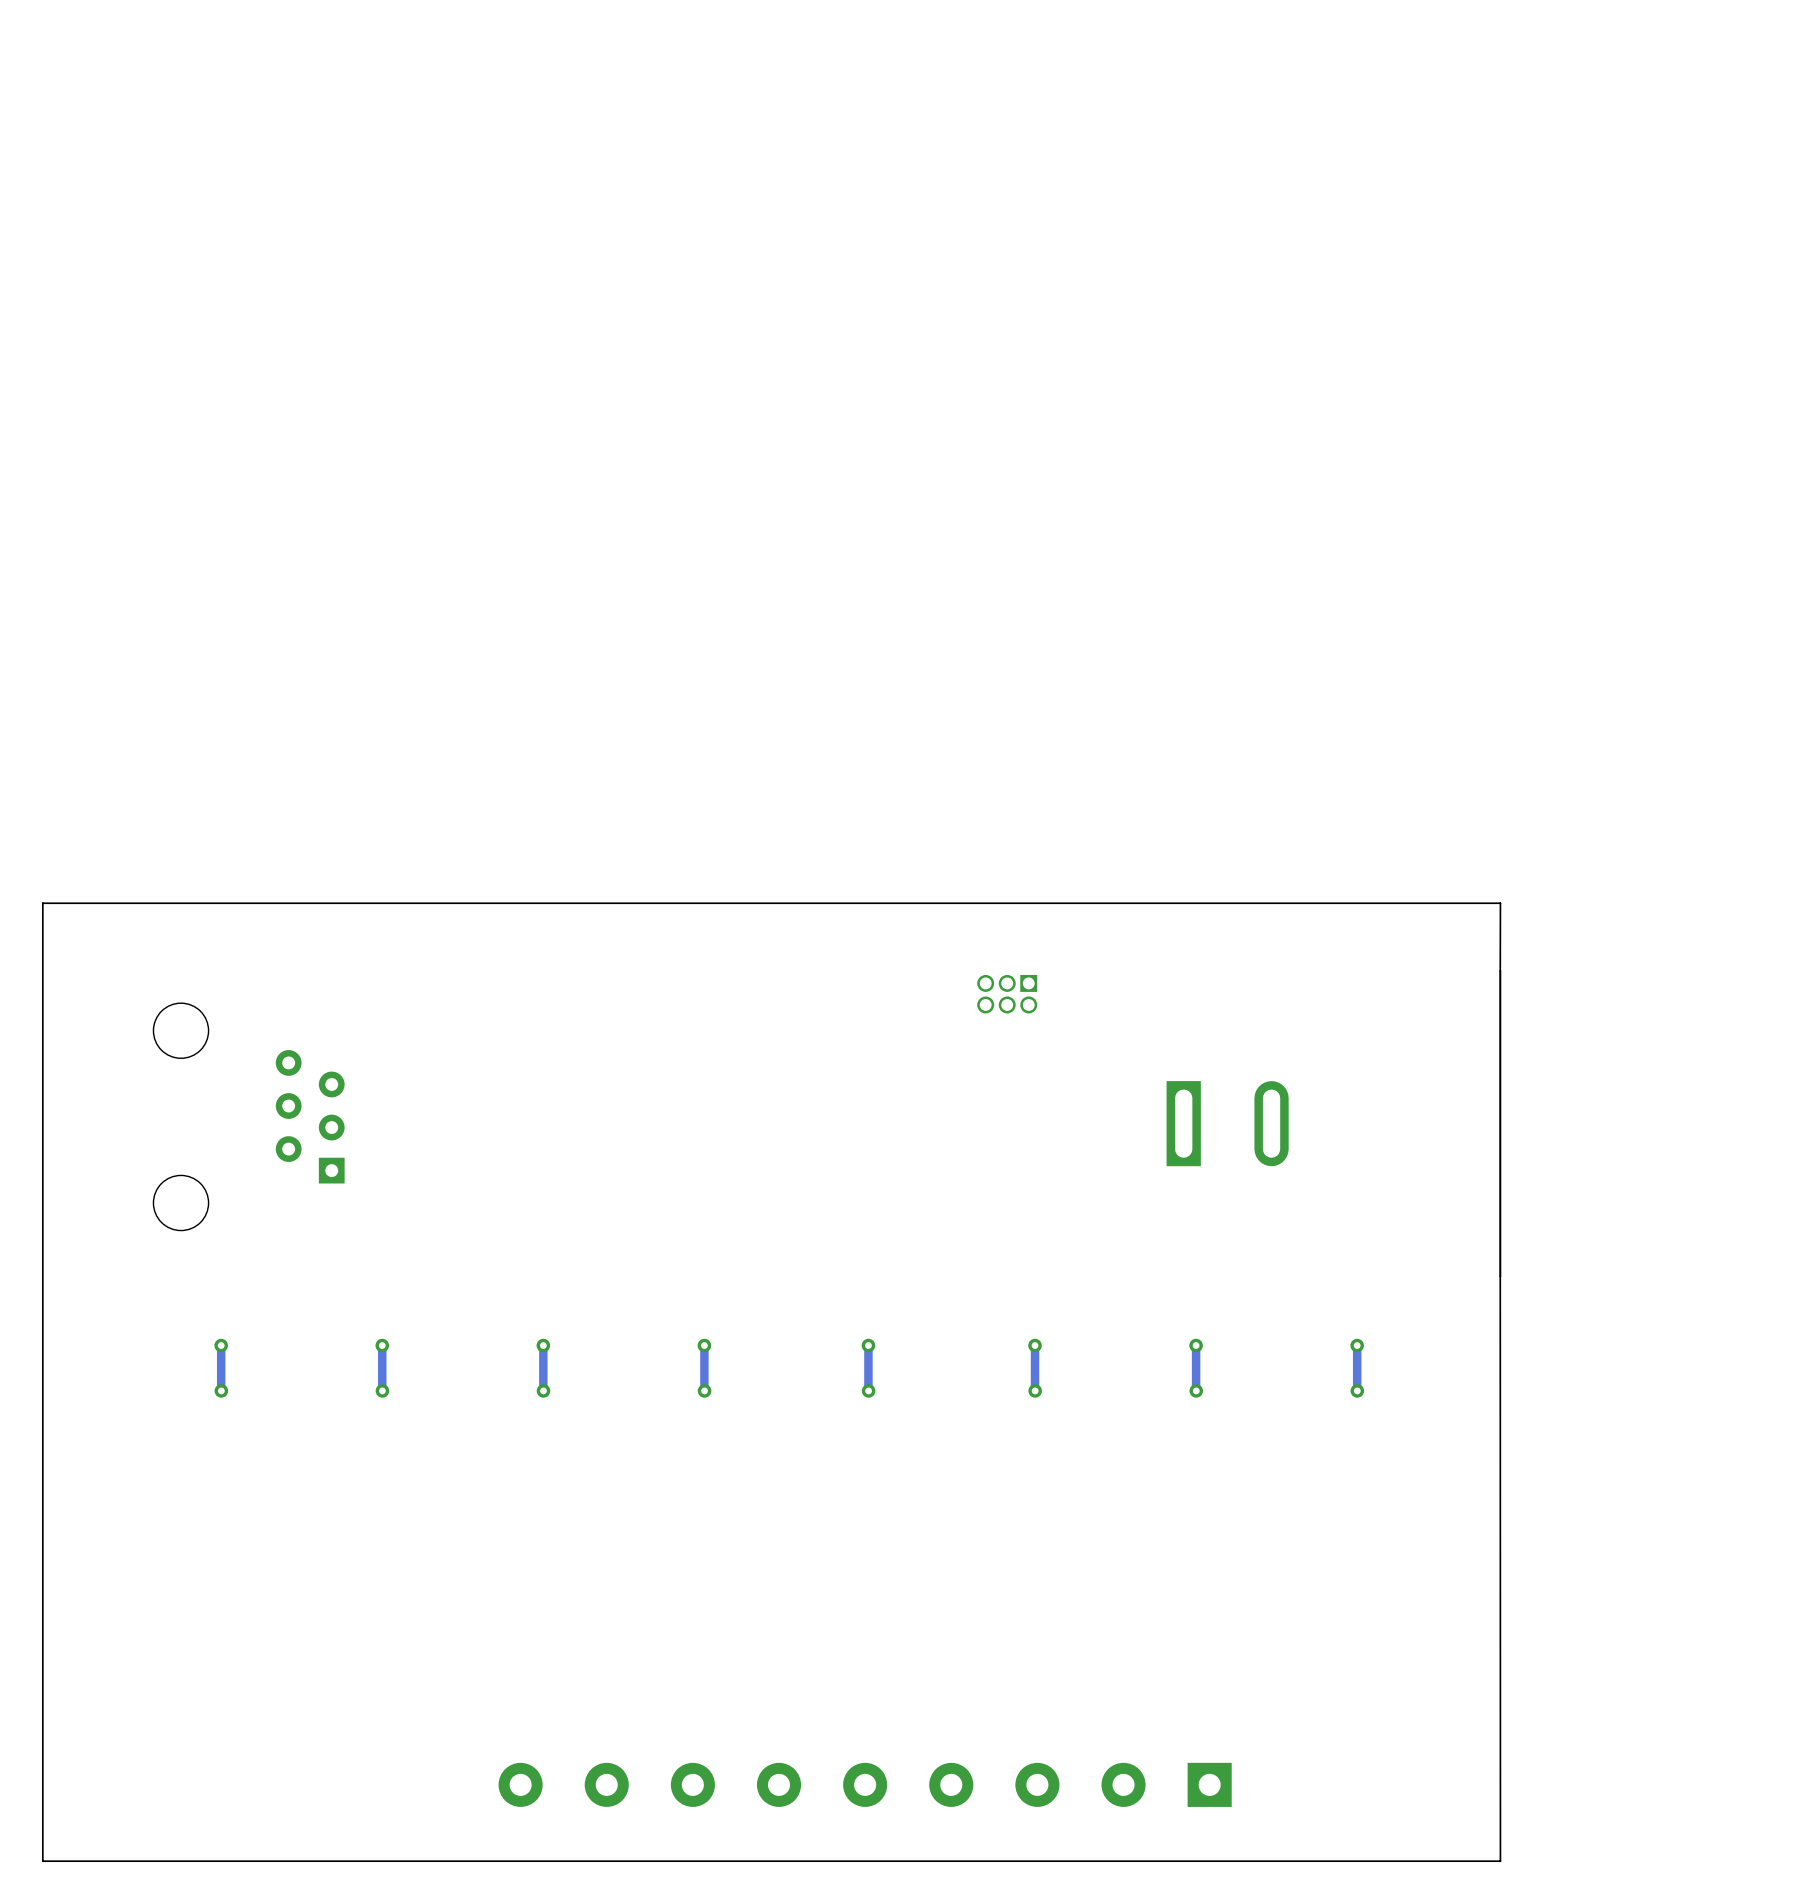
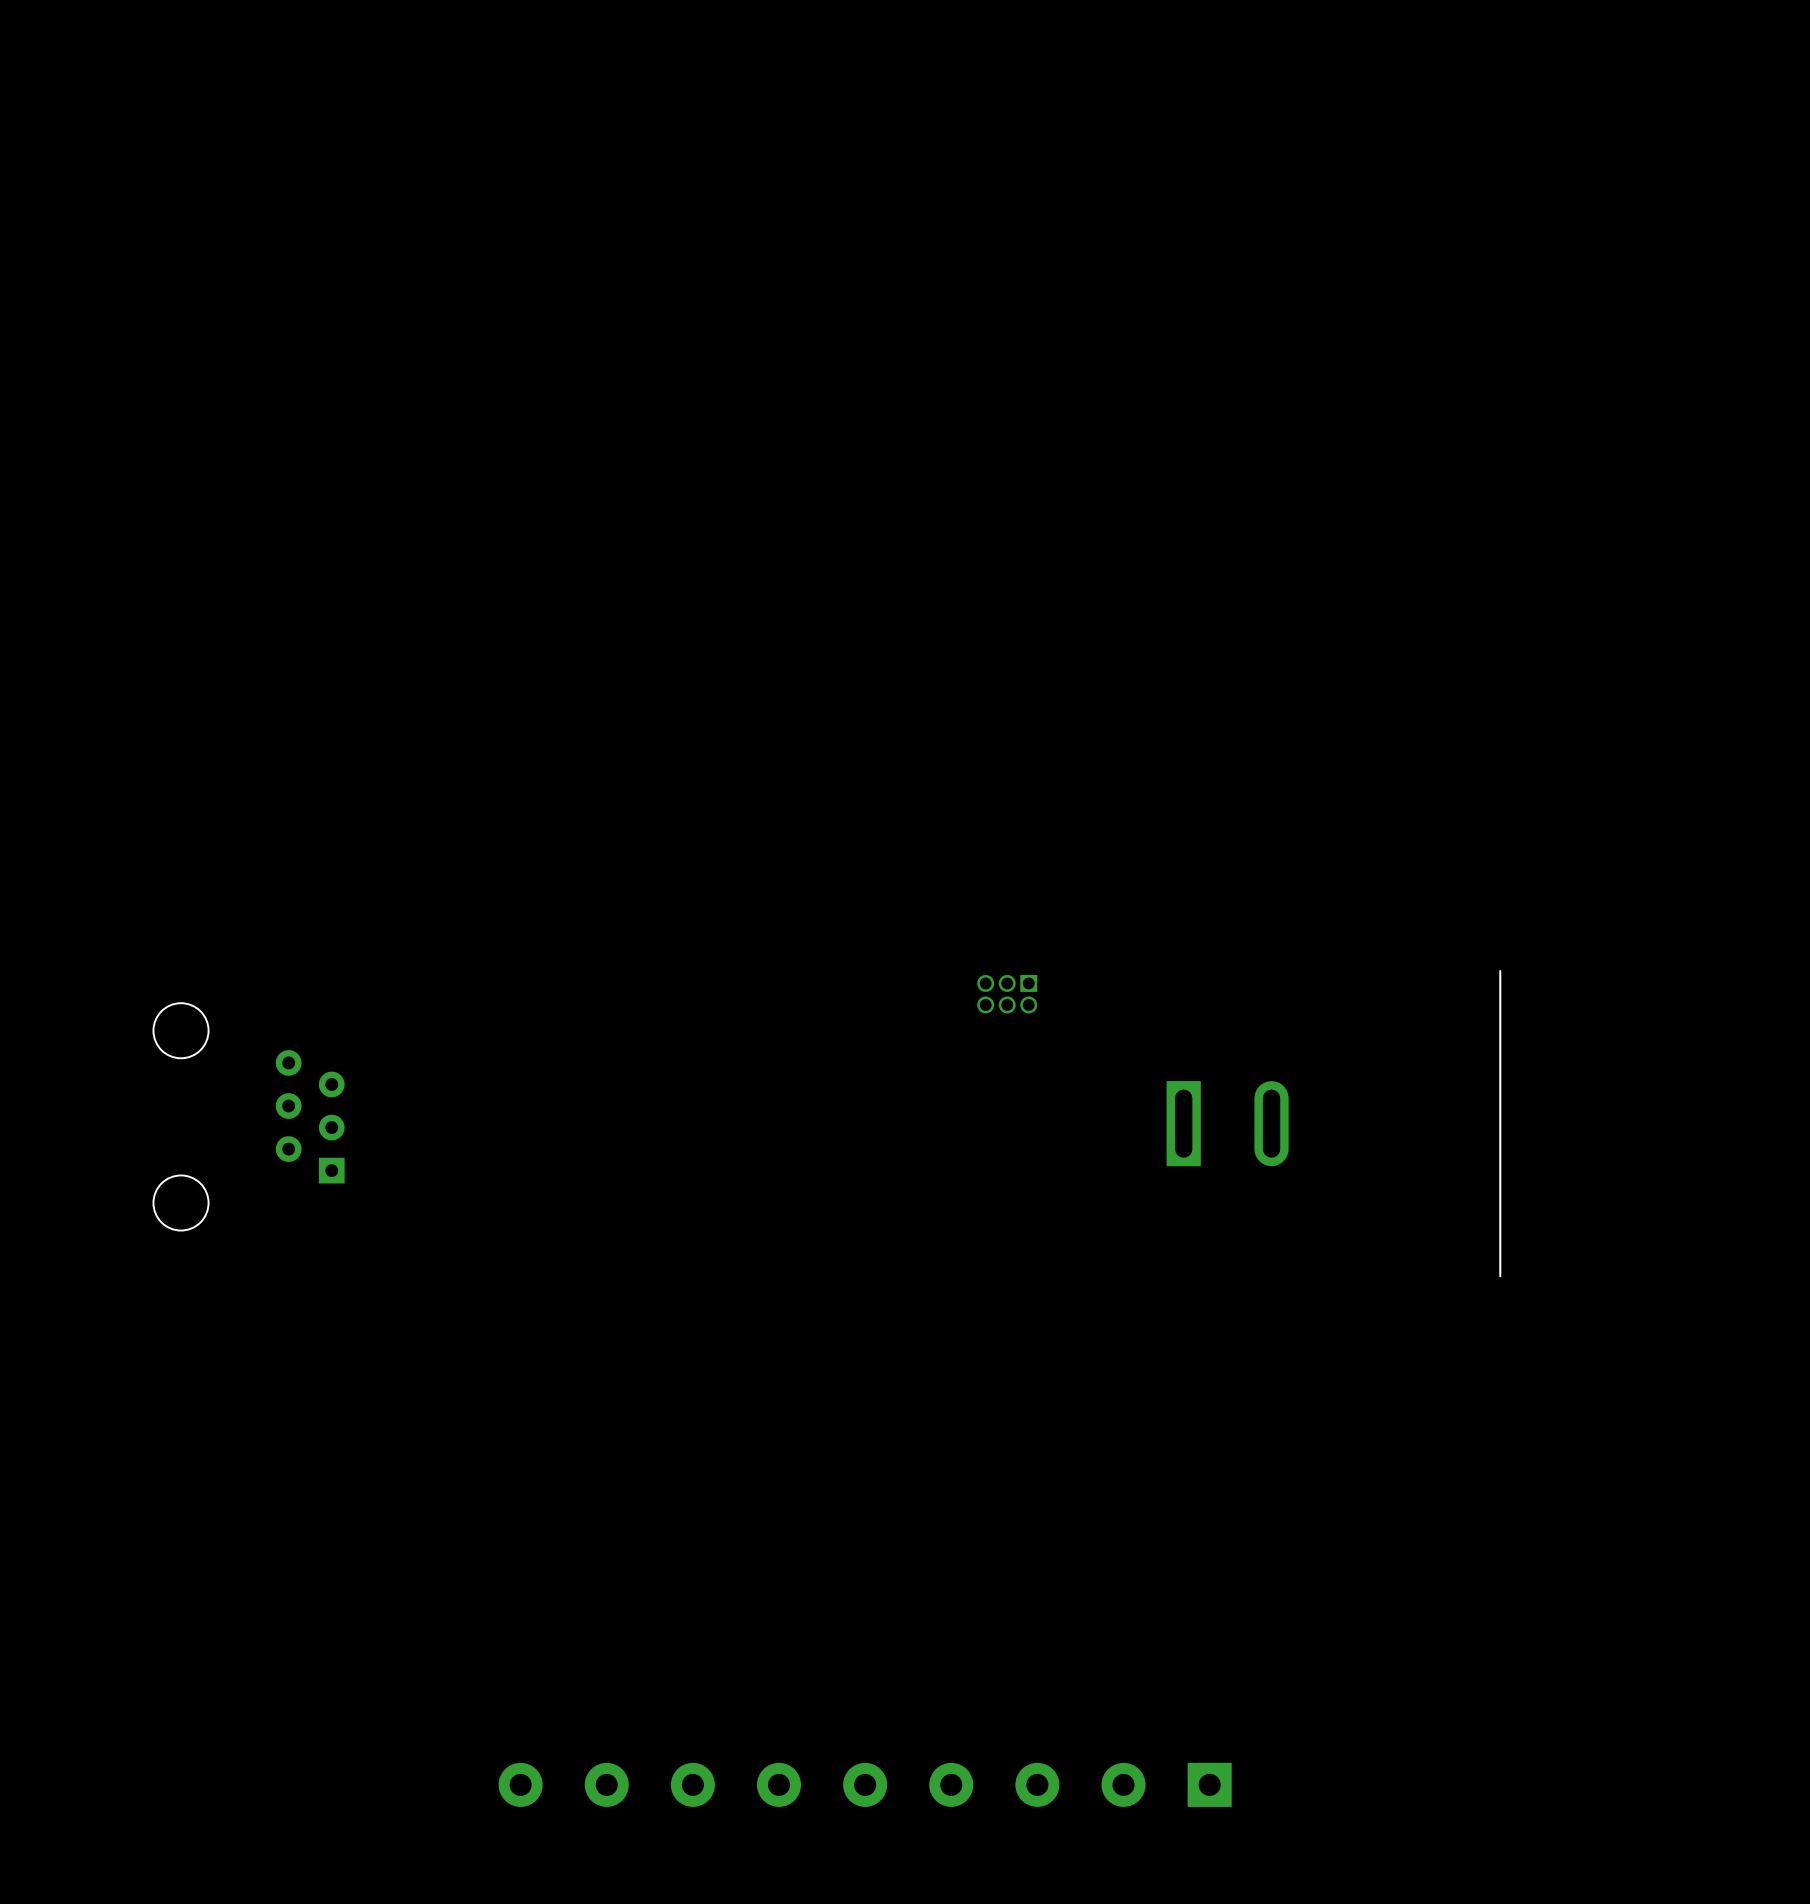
board edge: (1500, 971) (1500, 903) (42, 903) (42, 1861) (1500, 1861) (1500, 1276) -> none
track: (221, 1345) (221, 1390) -> none
via: (221, 1345) -> none
track: (382, 1345) (382, 1390) -> none
via: (382, 1345) -> none
track: (543, 1345) (543, 1390) -> none
via: (543, 1345) -> none
track: (704, 1345) (704, 1390) -> none
via: (704, 1345) -> none
track: (868, 1345) (868, 1390) -> none
via: (868, 1345) -> none
track: (1035, 1345) (1035, 1390) -> none
via: (1035, 1345) -> none
track: (1196, 1345) (1196, 1390) -> none
via: (1196, 1345) -> none
track: (1357, 1345) (1357, 1390) -> none
via: (1357, 1345) -> none
via: (221, 1390) -> none
via: (382, 1390) -> none
via: (543, 1390) -> none
via: (704, 1390) -> none
via: (868, 1390) -> none
via: (1035, 1390) -> none
via: (1196, 1390) -> none
via: (1357, 1390) -> none

